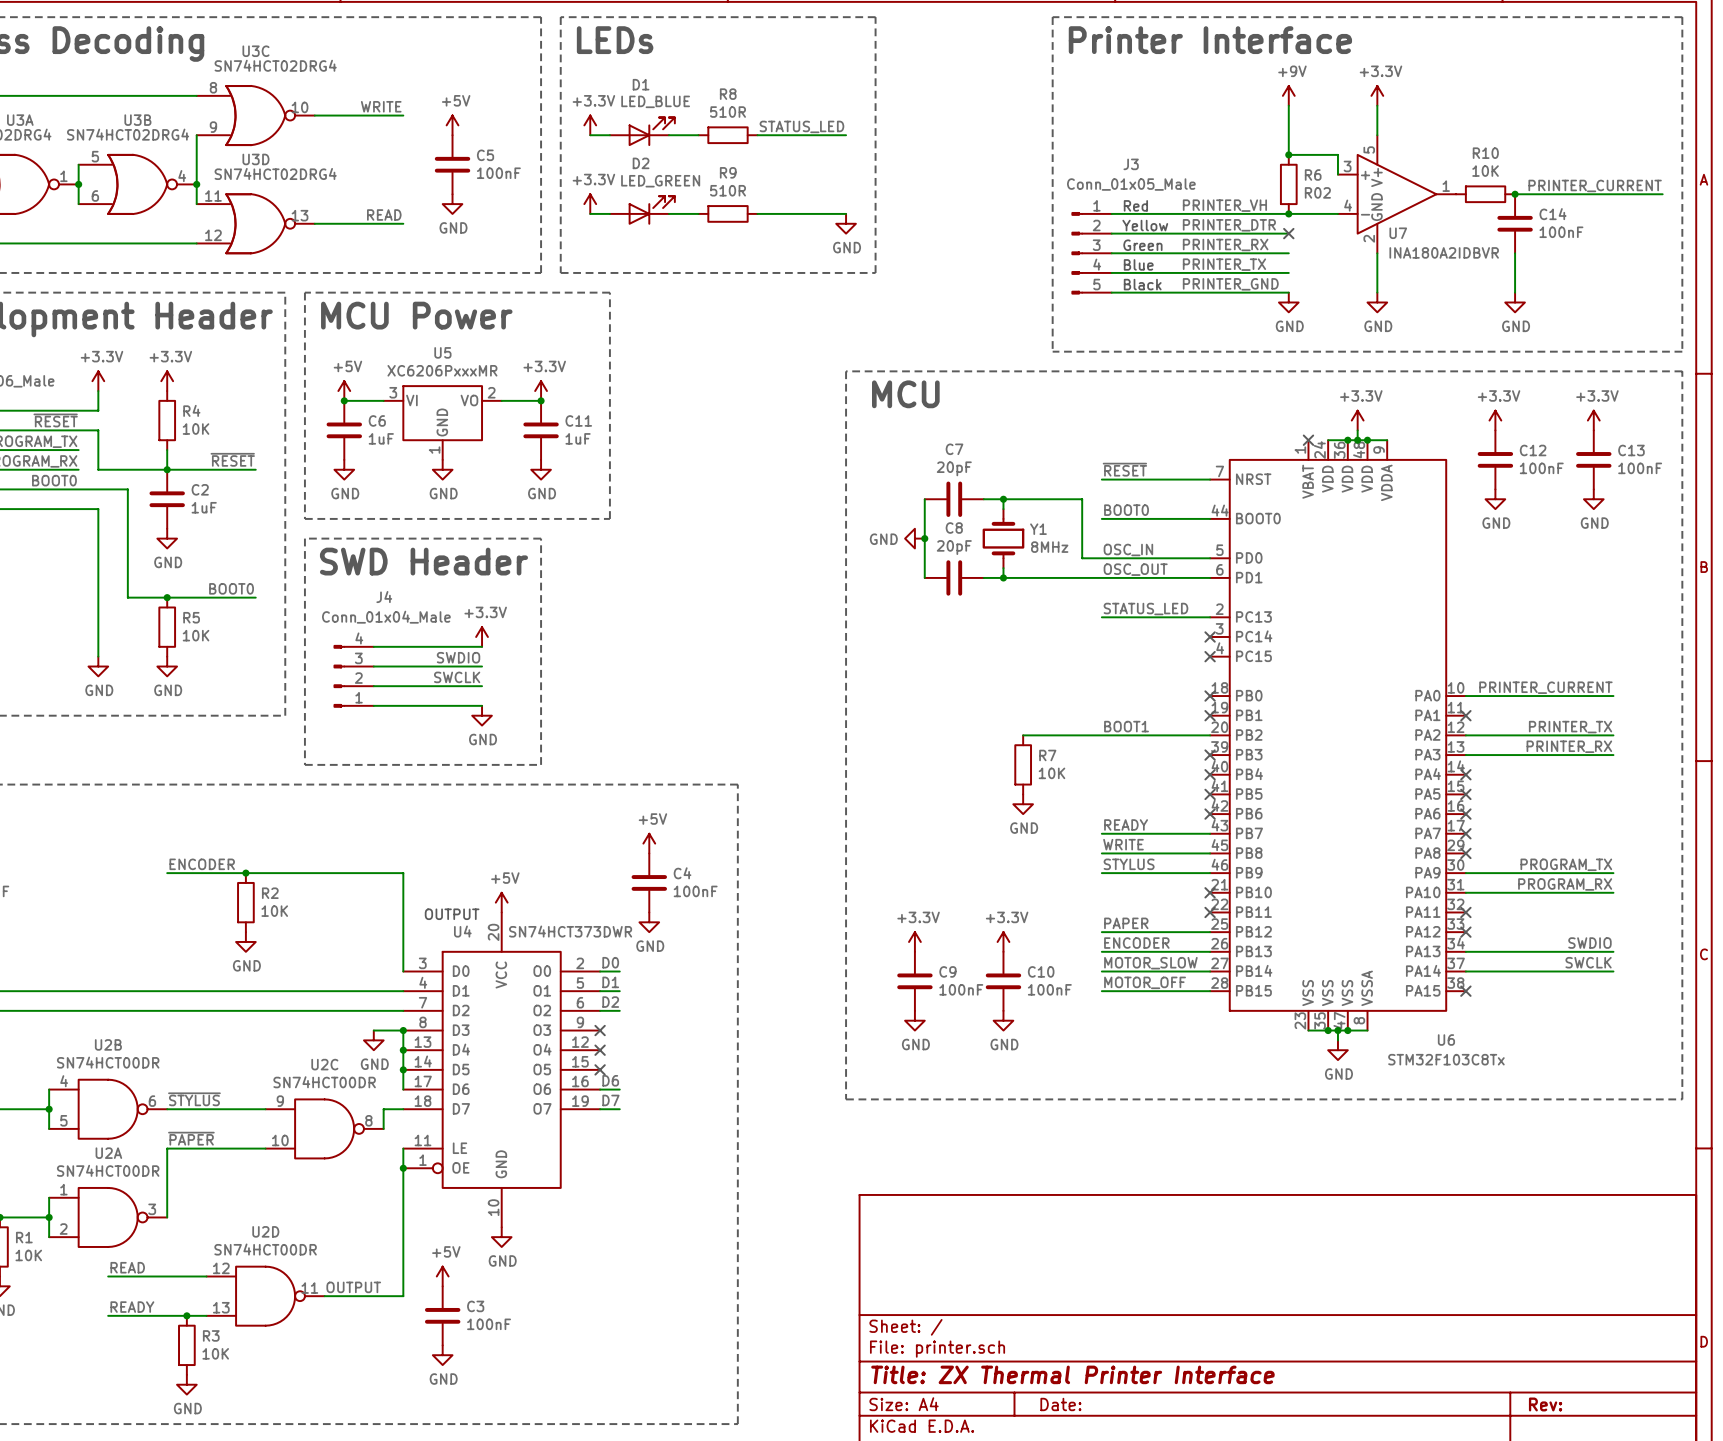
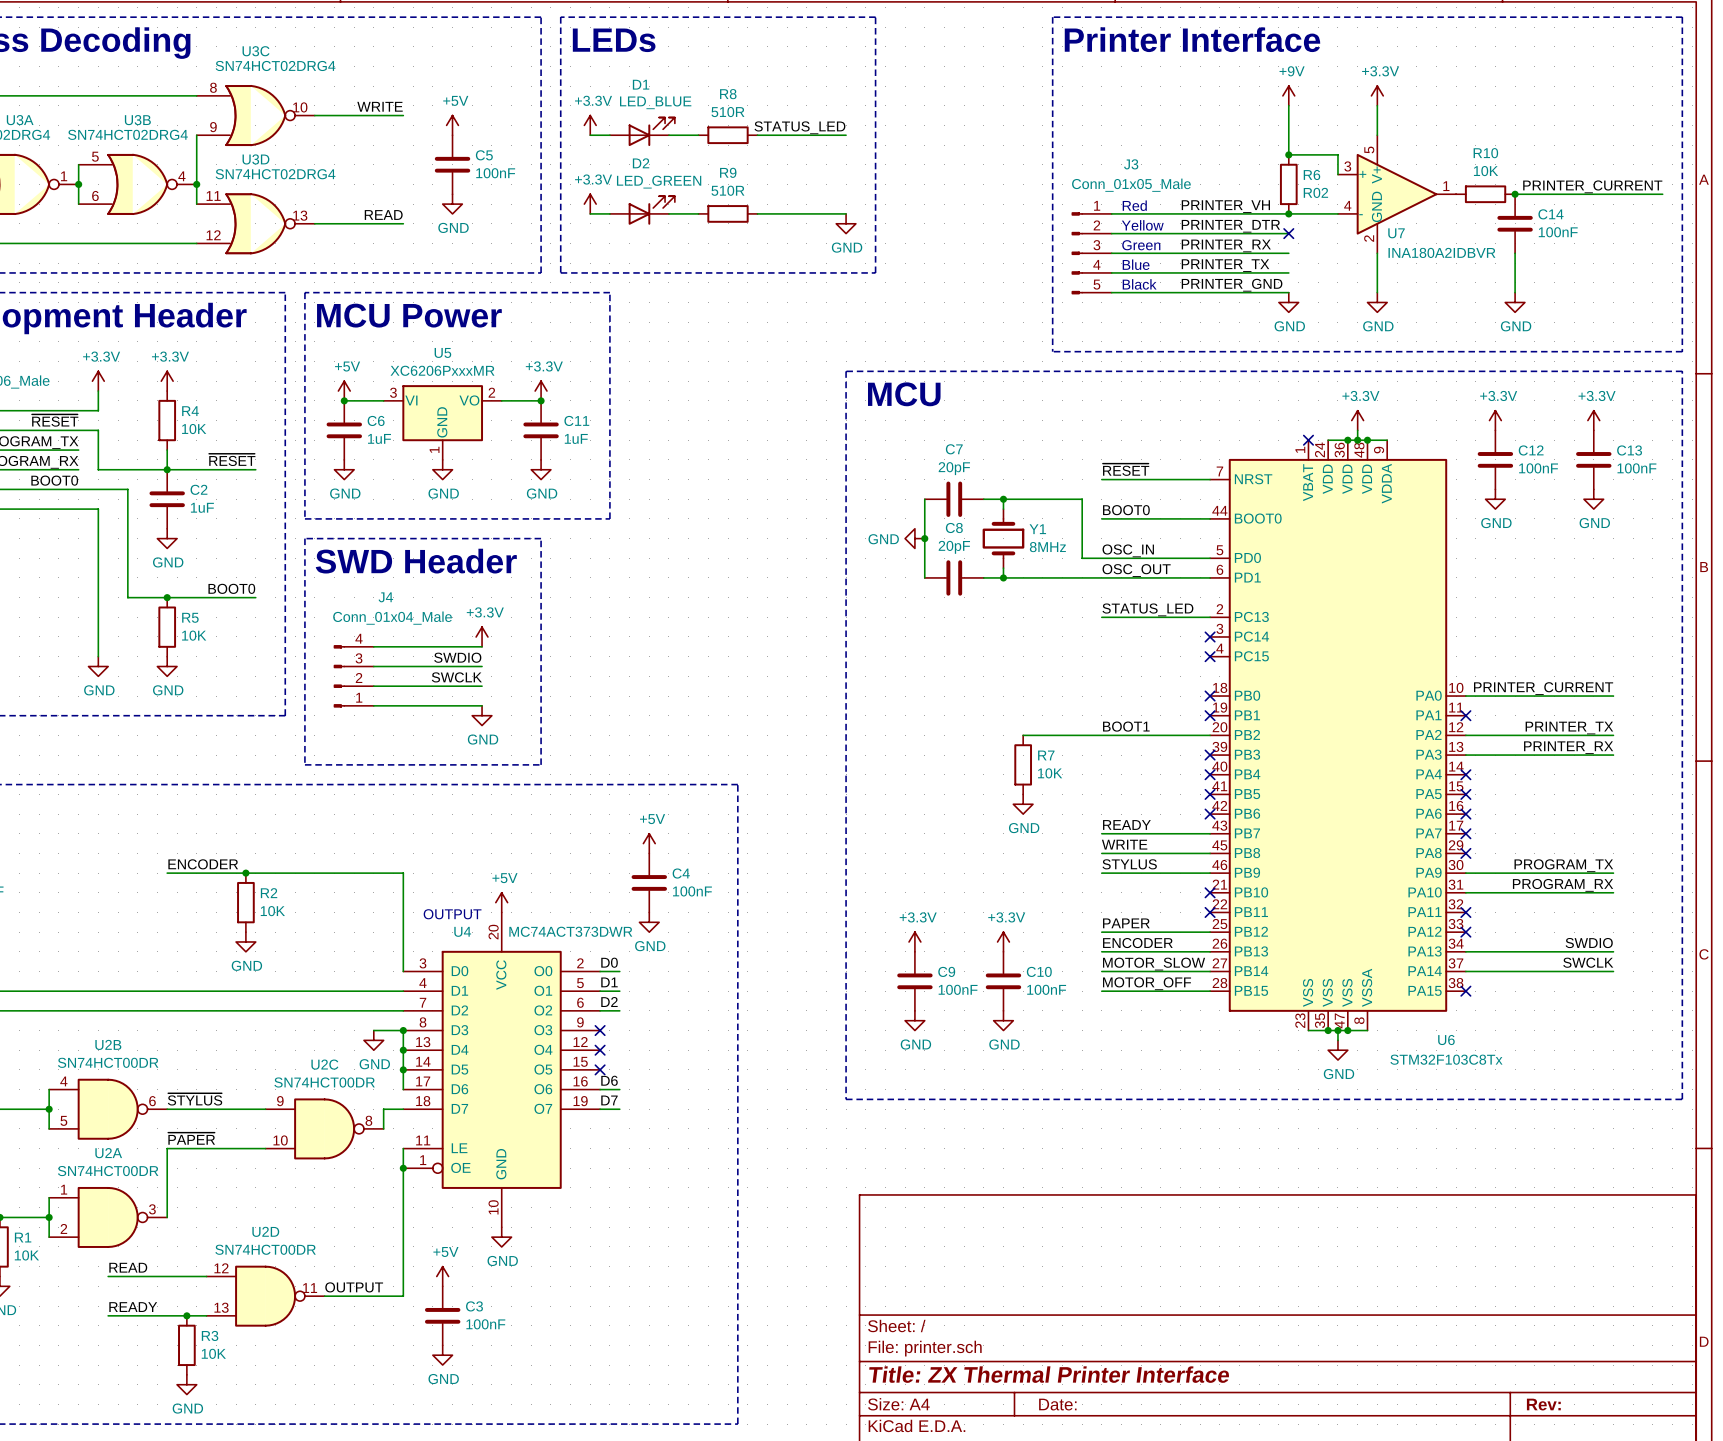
U4 value: SN74HCT373DWR (570, 931) -> MC74ACT373DWR (570, 931)

